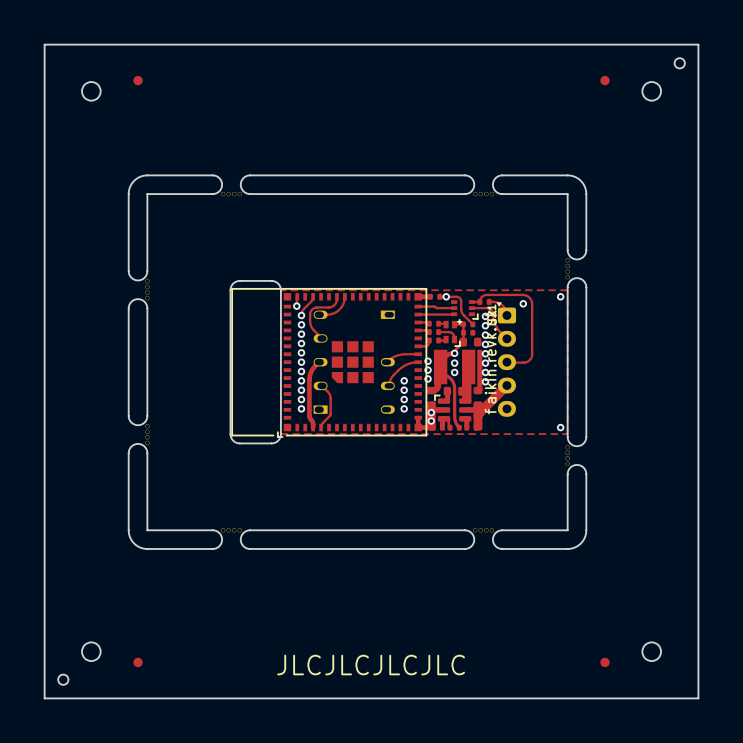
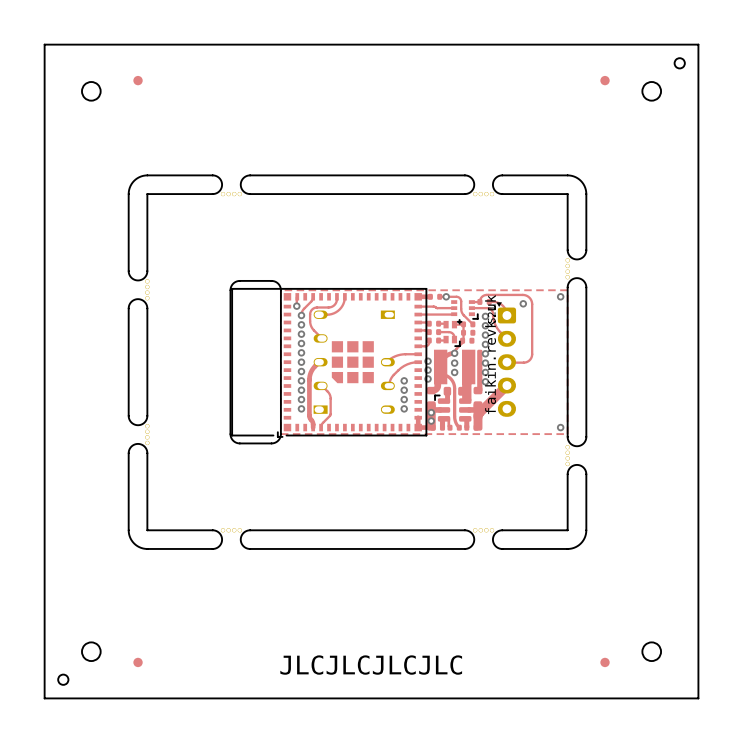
part footprint: [459, 337, 482, 347] -> [460, 337, 475, 344]

